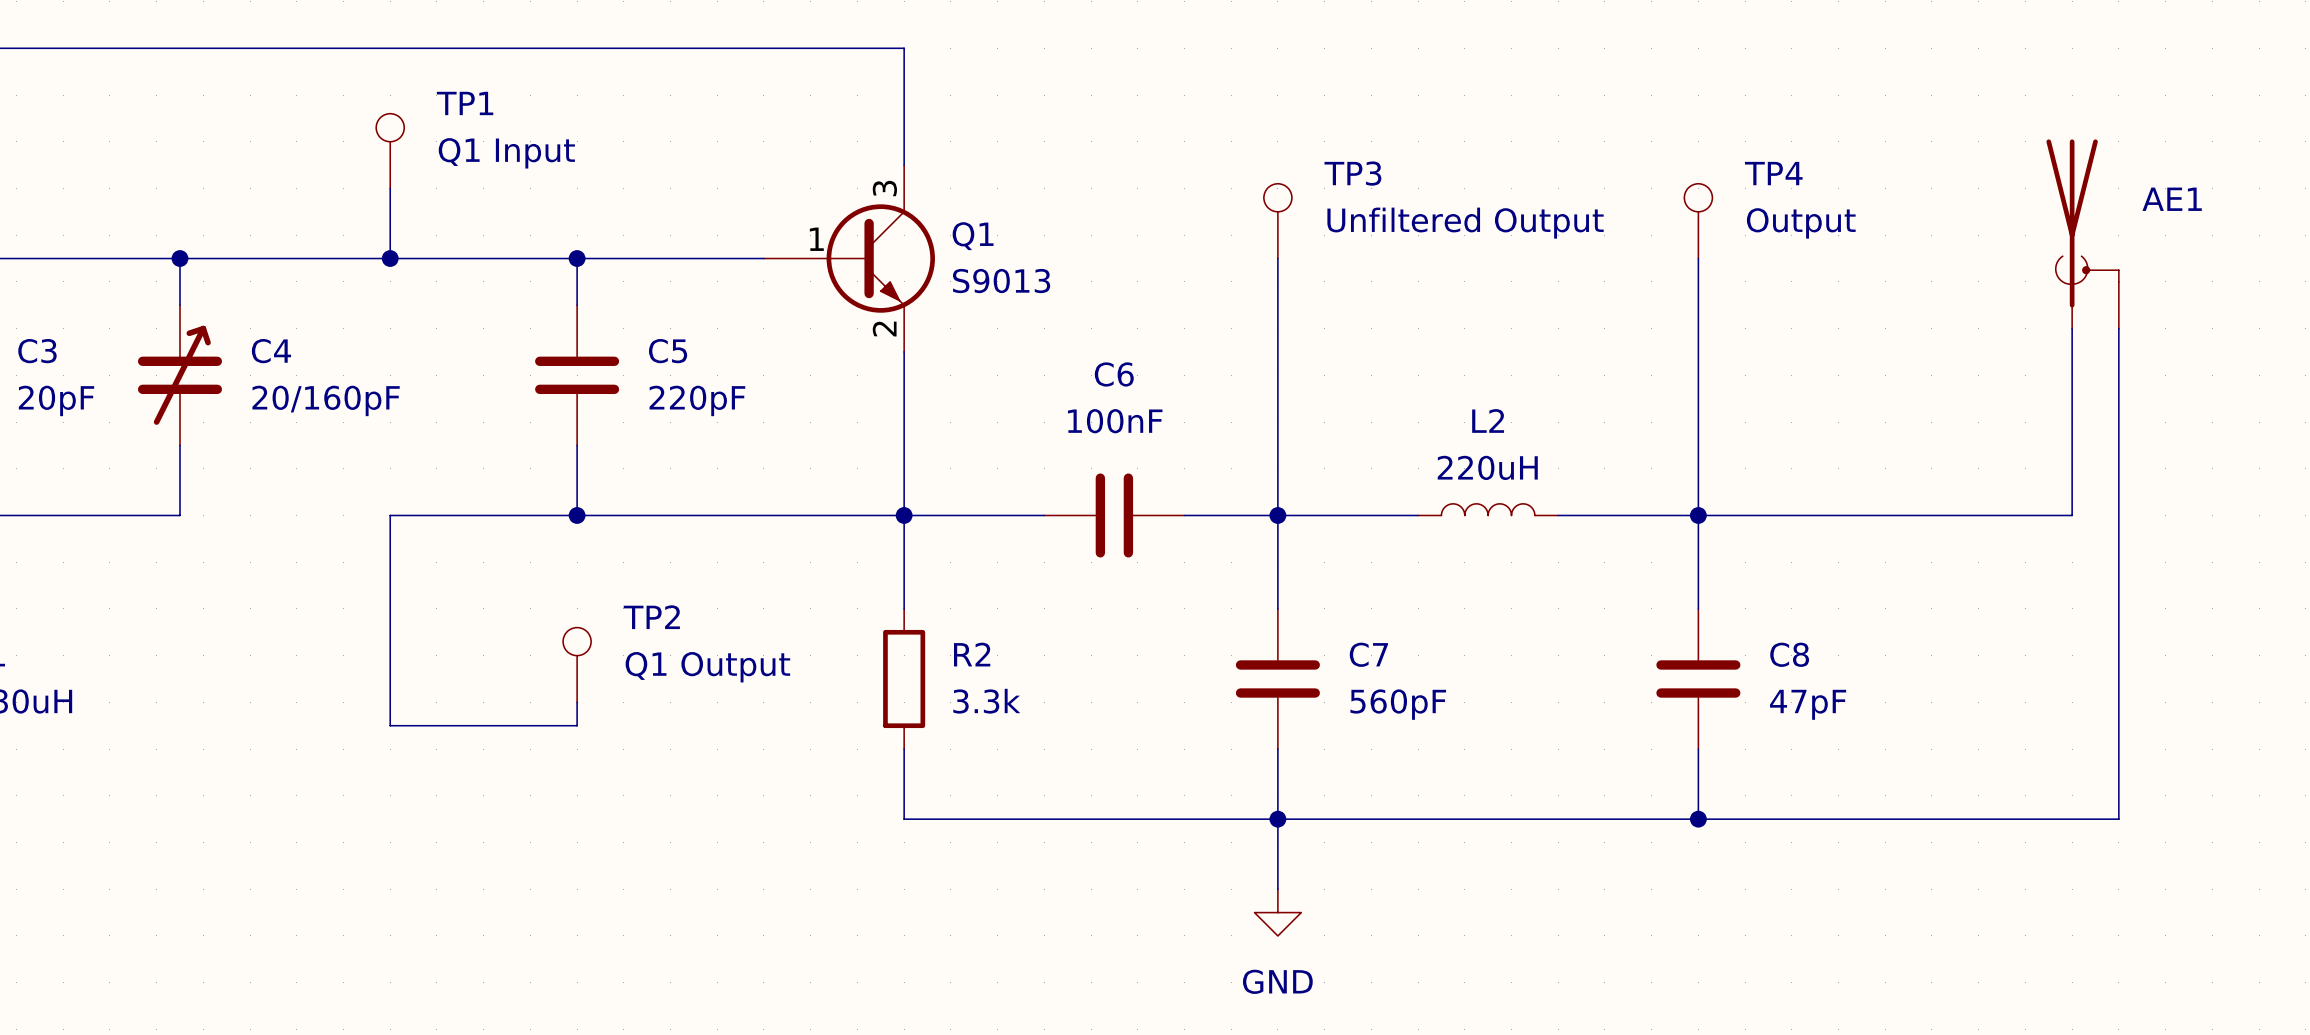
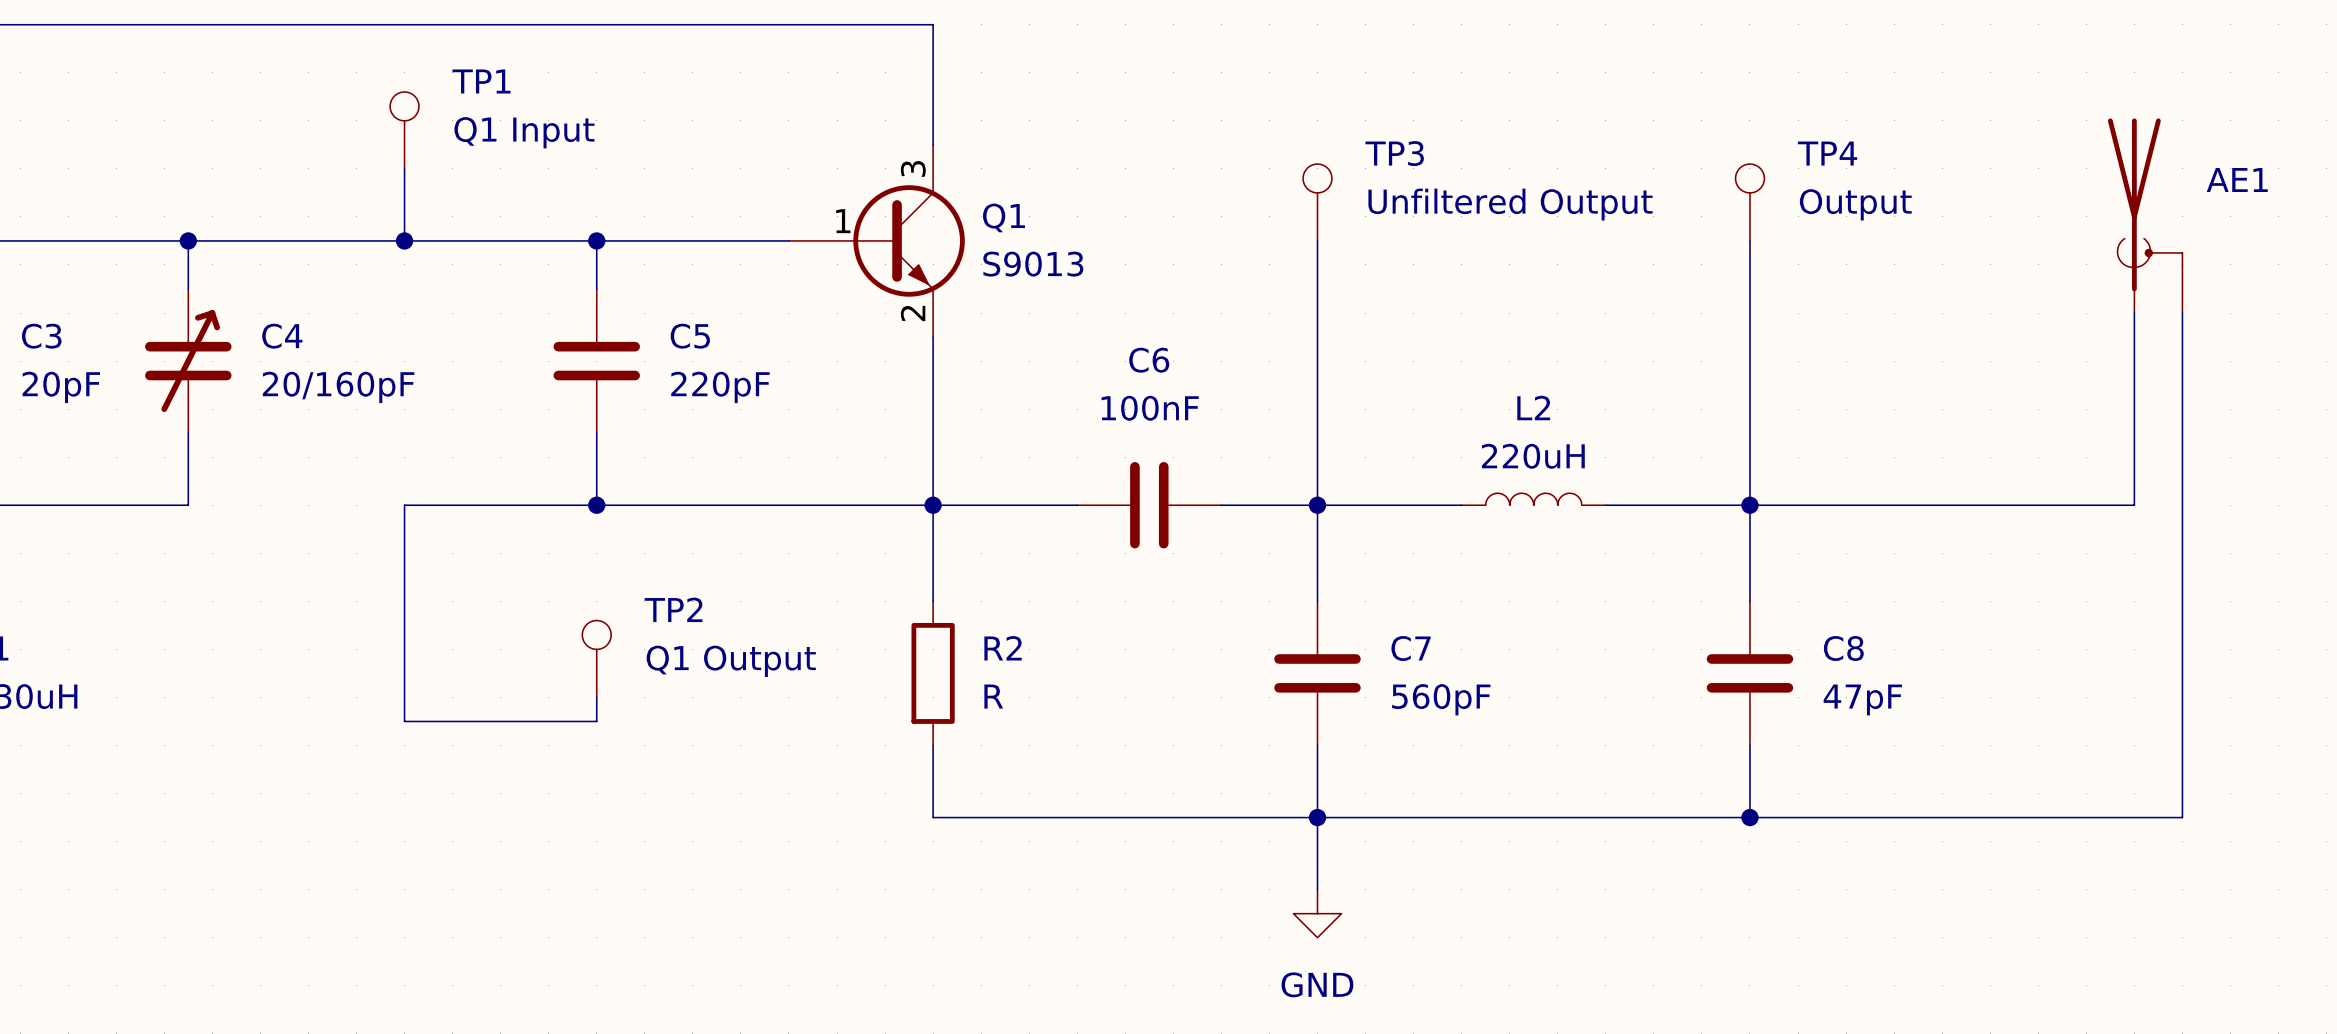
R2 value: 3.3k (986, 701) -> R (993, 696)

